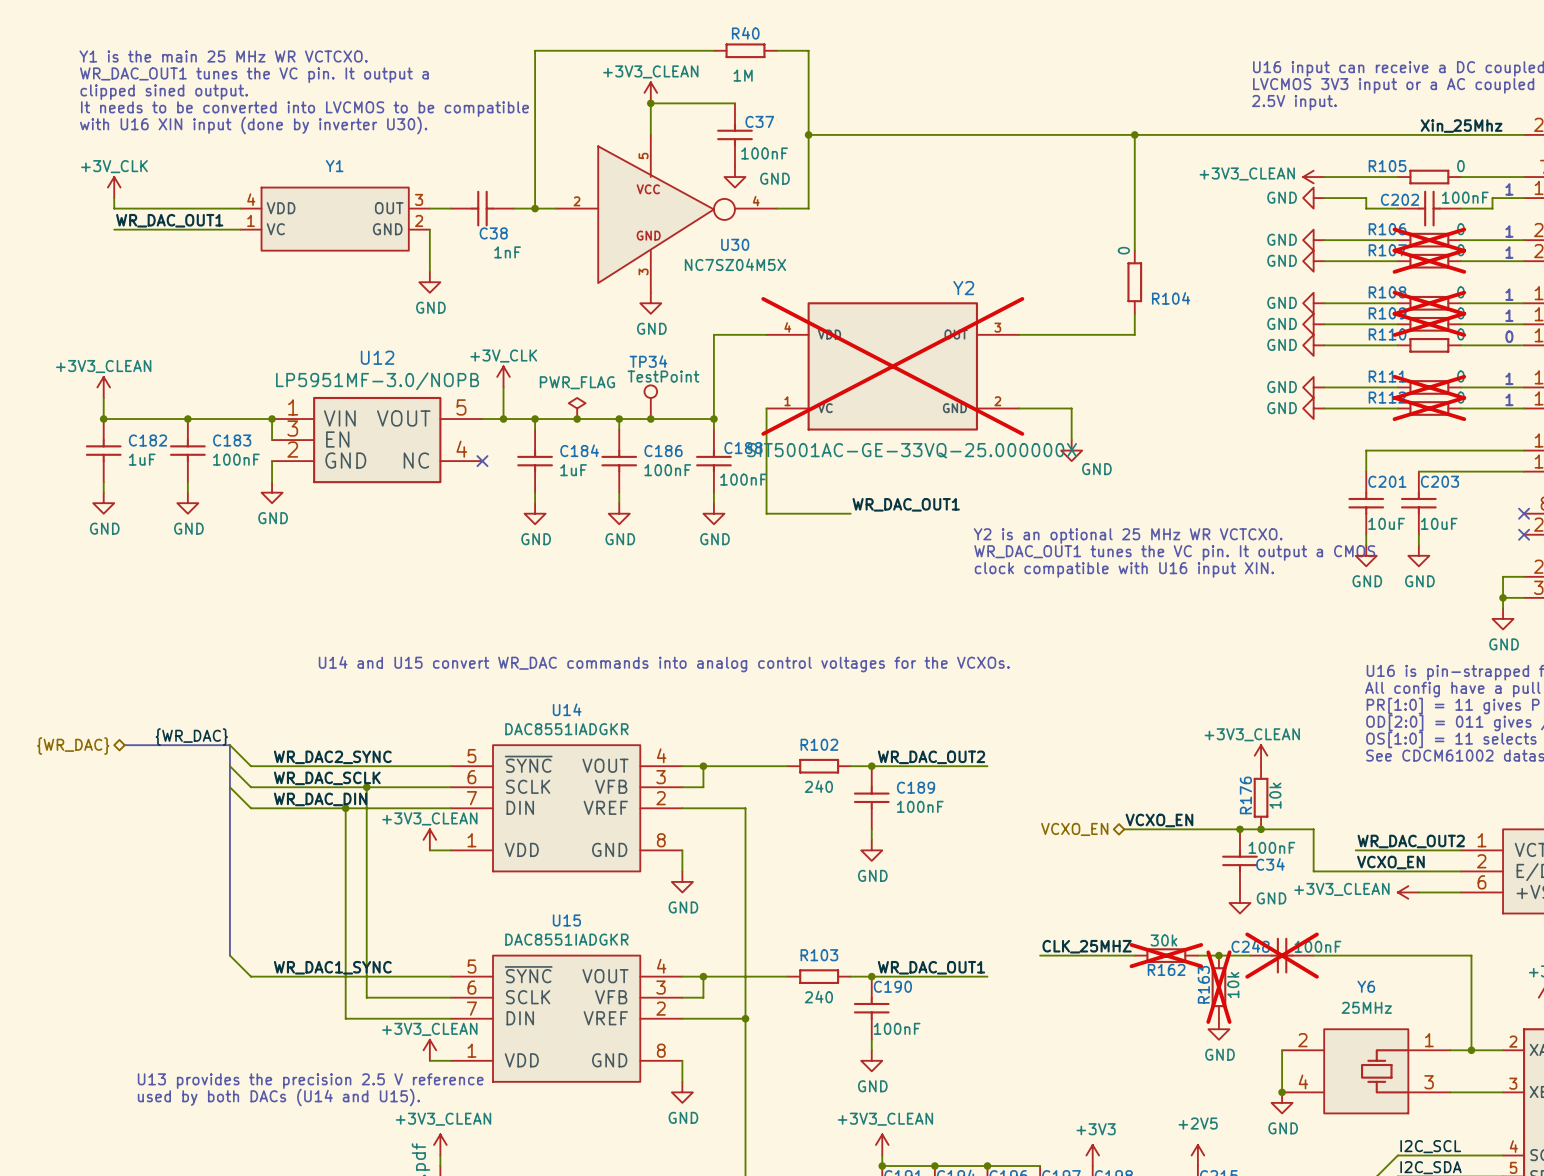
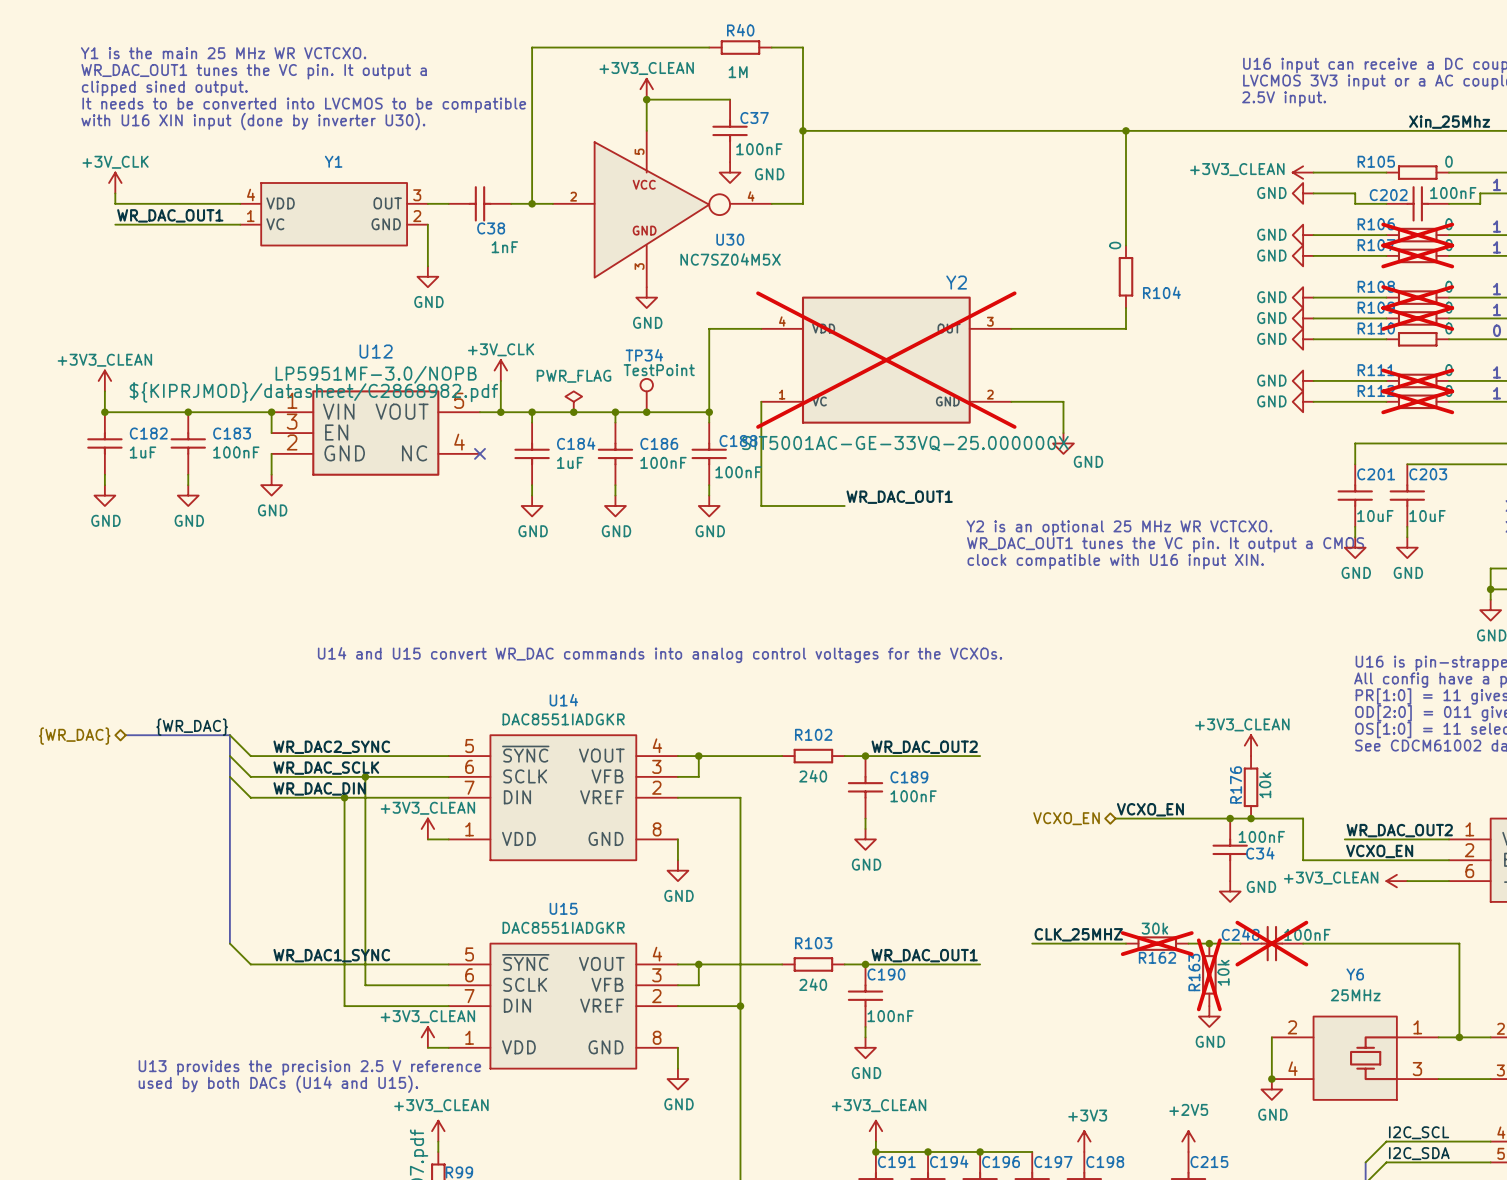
U12 text: none -> ${KIPRJMOD}/datasheet/C2868982.pdf (313, 392)

